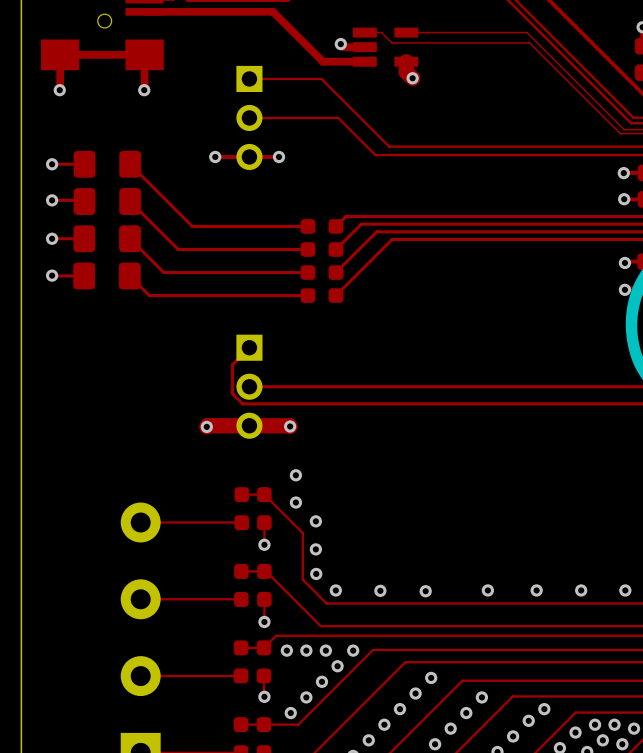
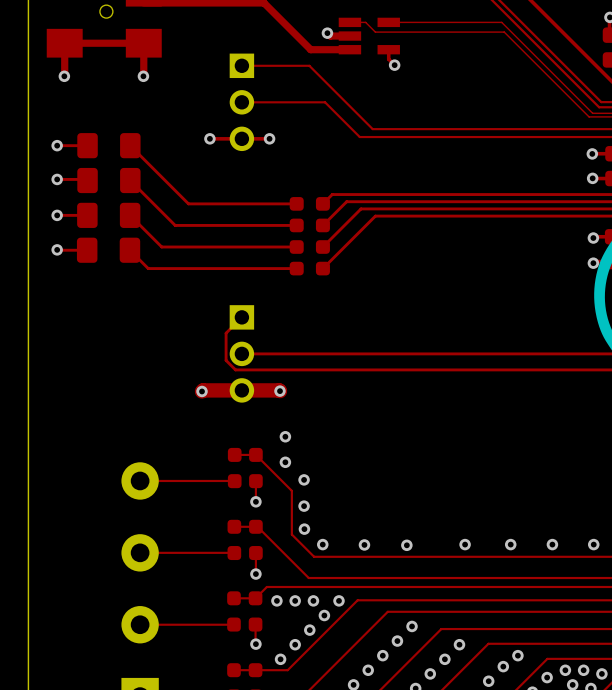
top track width: thick (406, 61) (406, 71) (412, 78) -> thin (388, 49) (388, 59) (394, 65)

